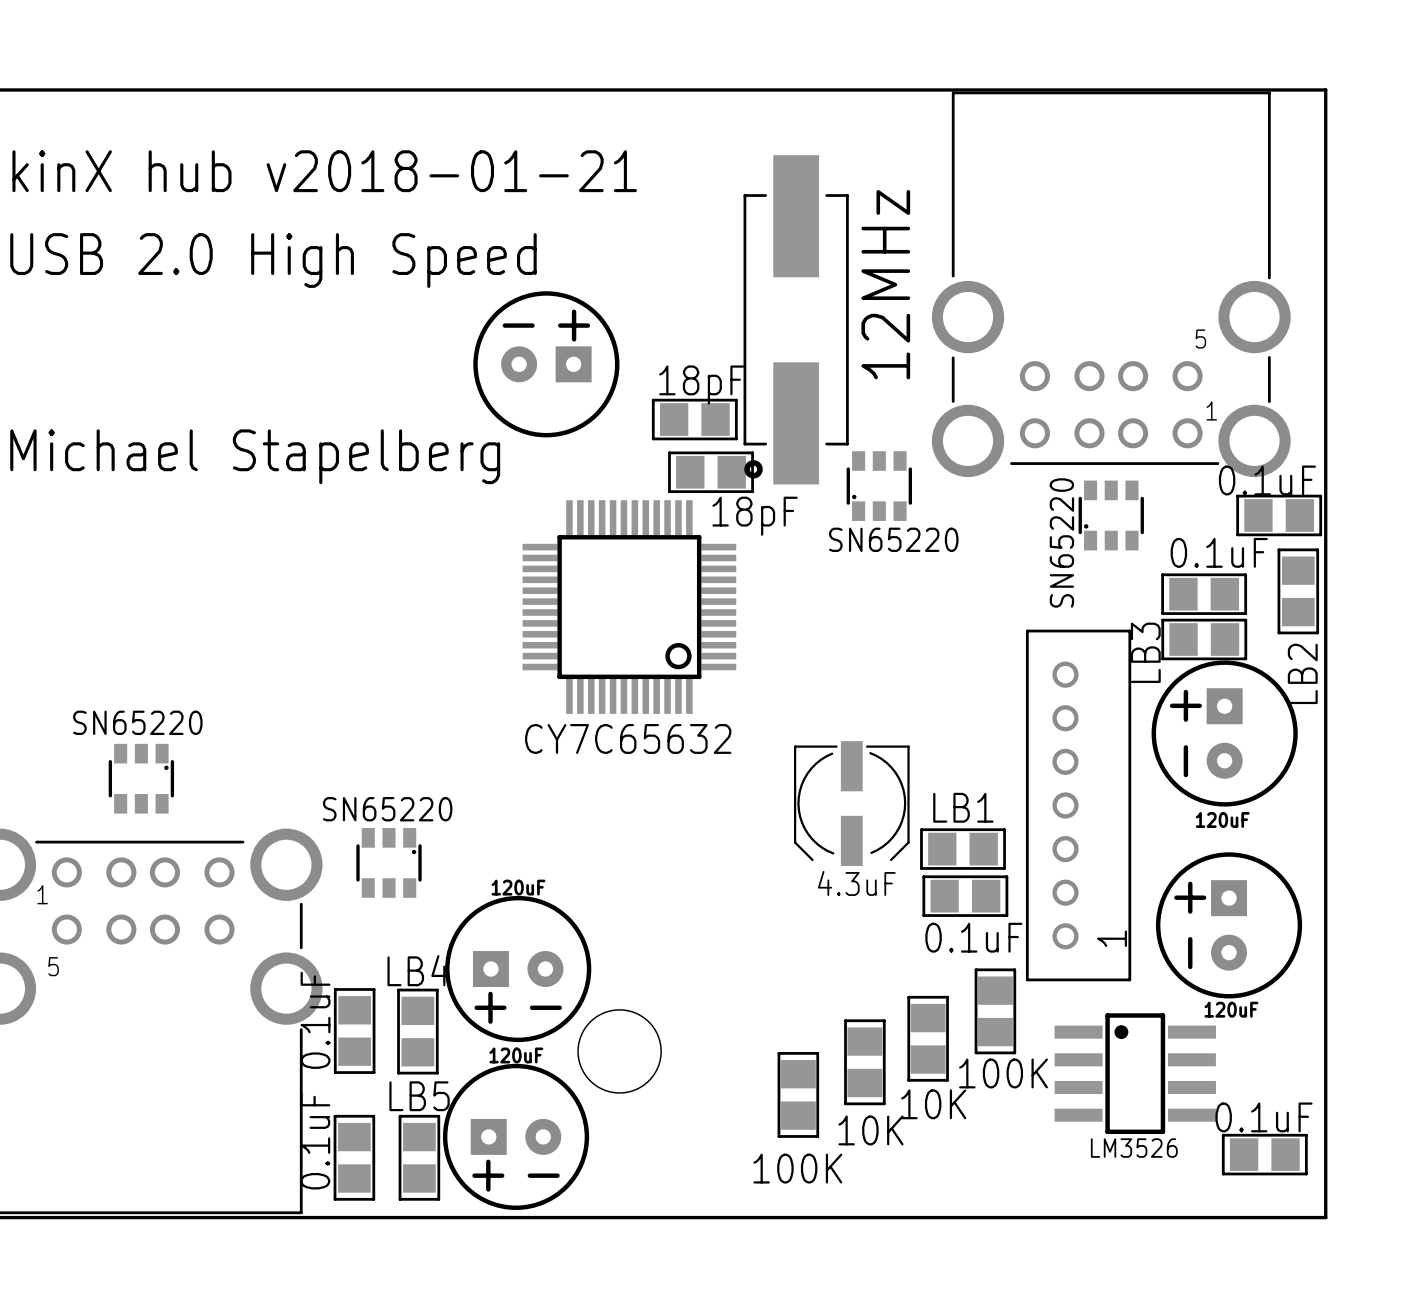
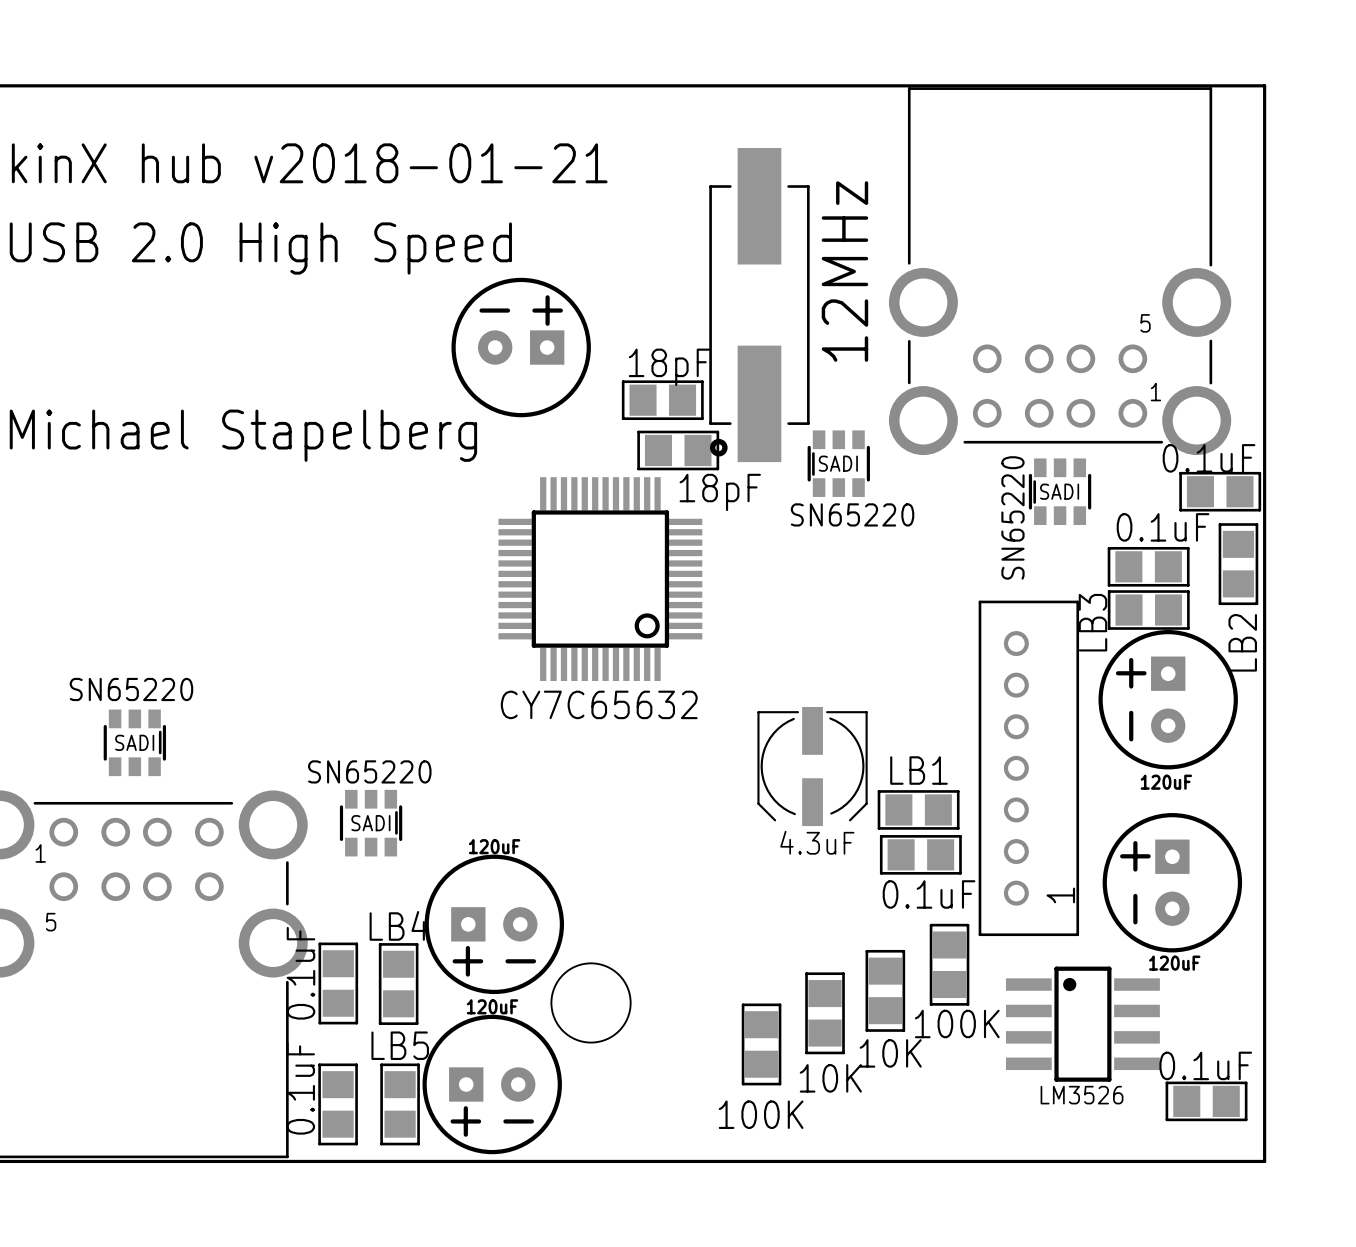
part footprint: [846, 451, 912, 521] -> [807, 430, 870, 497]
part footprint: [1078, 480, 1144, 551] -> [1028, 458, 1092, 525]
part footprint: [108, 743, 175, 814] -> [103, 709, 167, 777]
part footprint: [356, 828, 422, 898] -> [339, 789, 403, 857]

